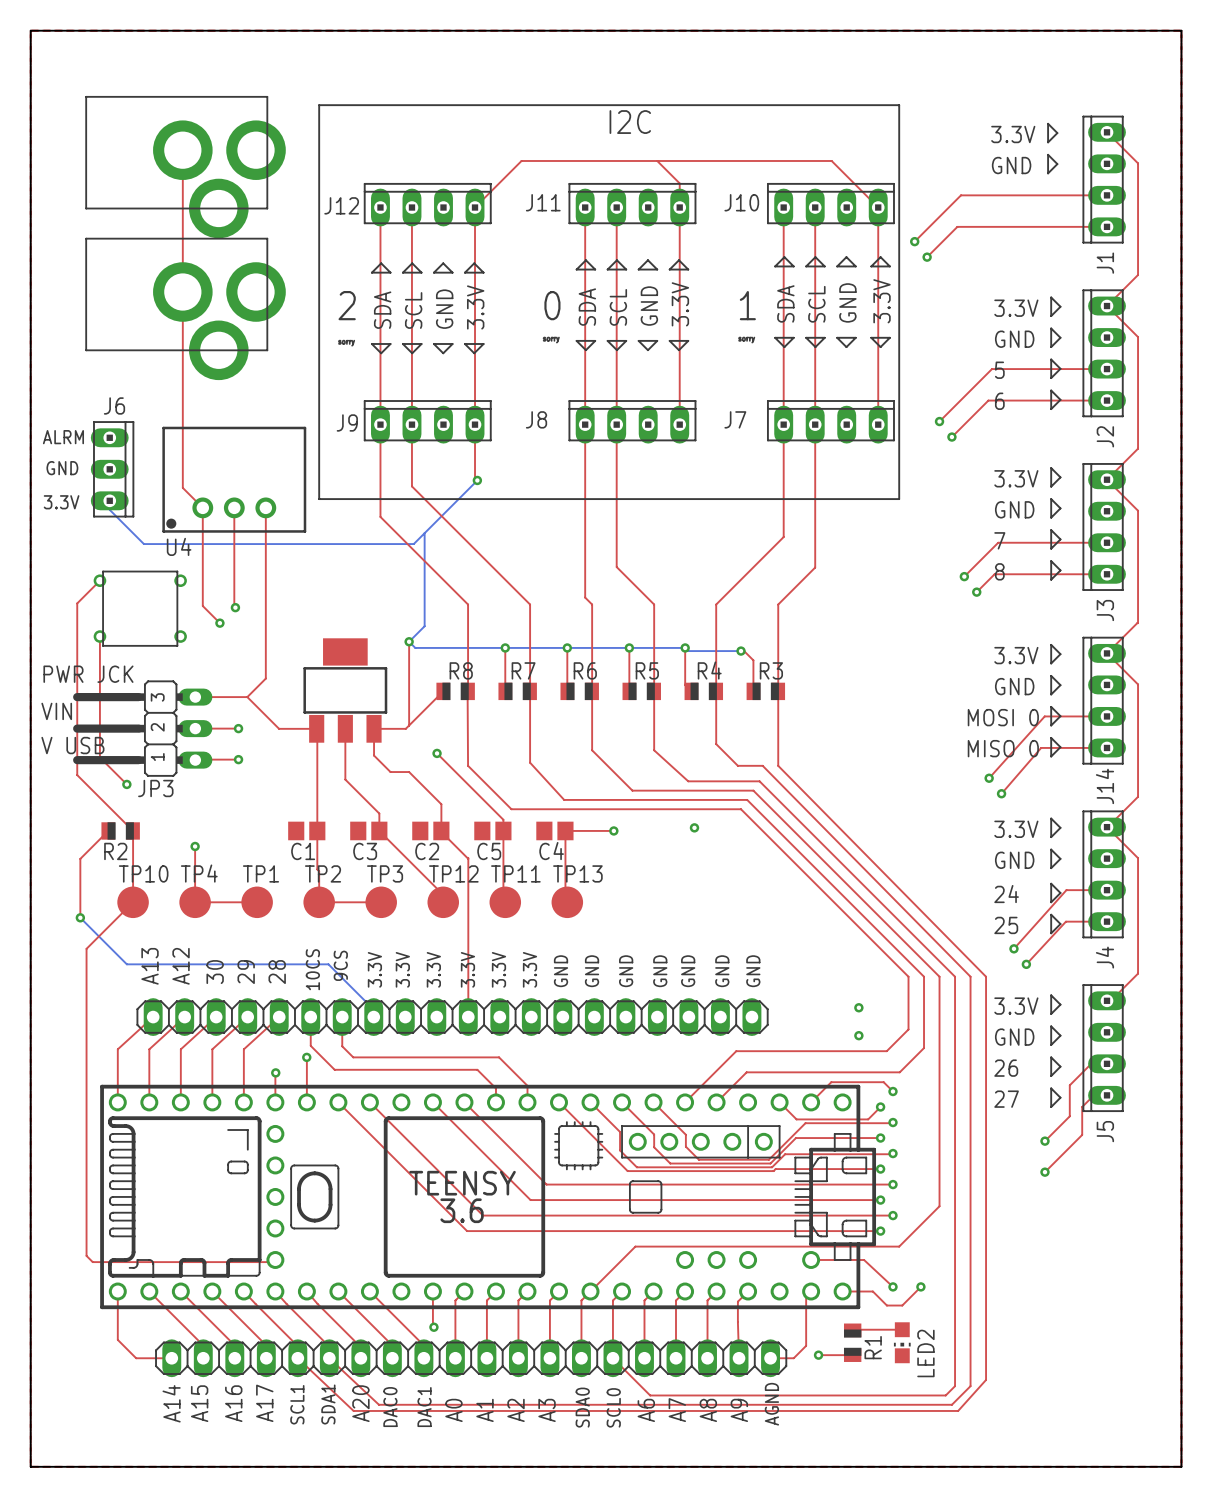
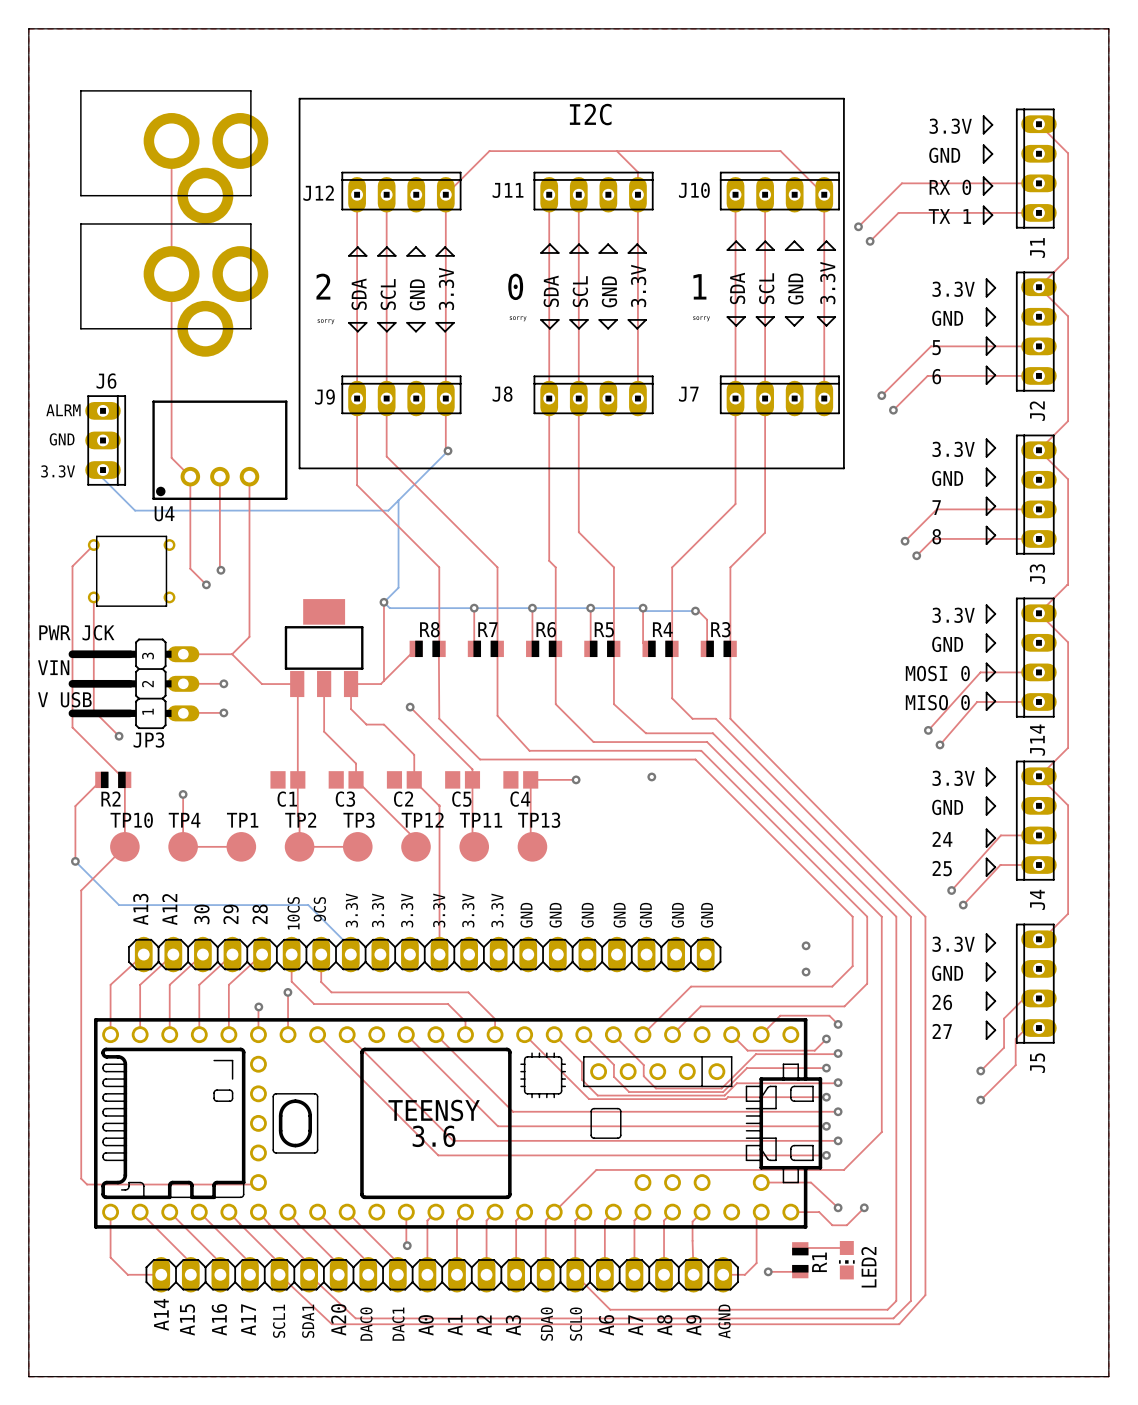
line: none -> (983, 177) (983, 194) (992, 186) (983, 177)
text: none -> RX 0 (950, 187)
line: none -> (983, 206) (992, 215) (983, 223) (983, 206)
text: none -> TX 1 (949, 216)

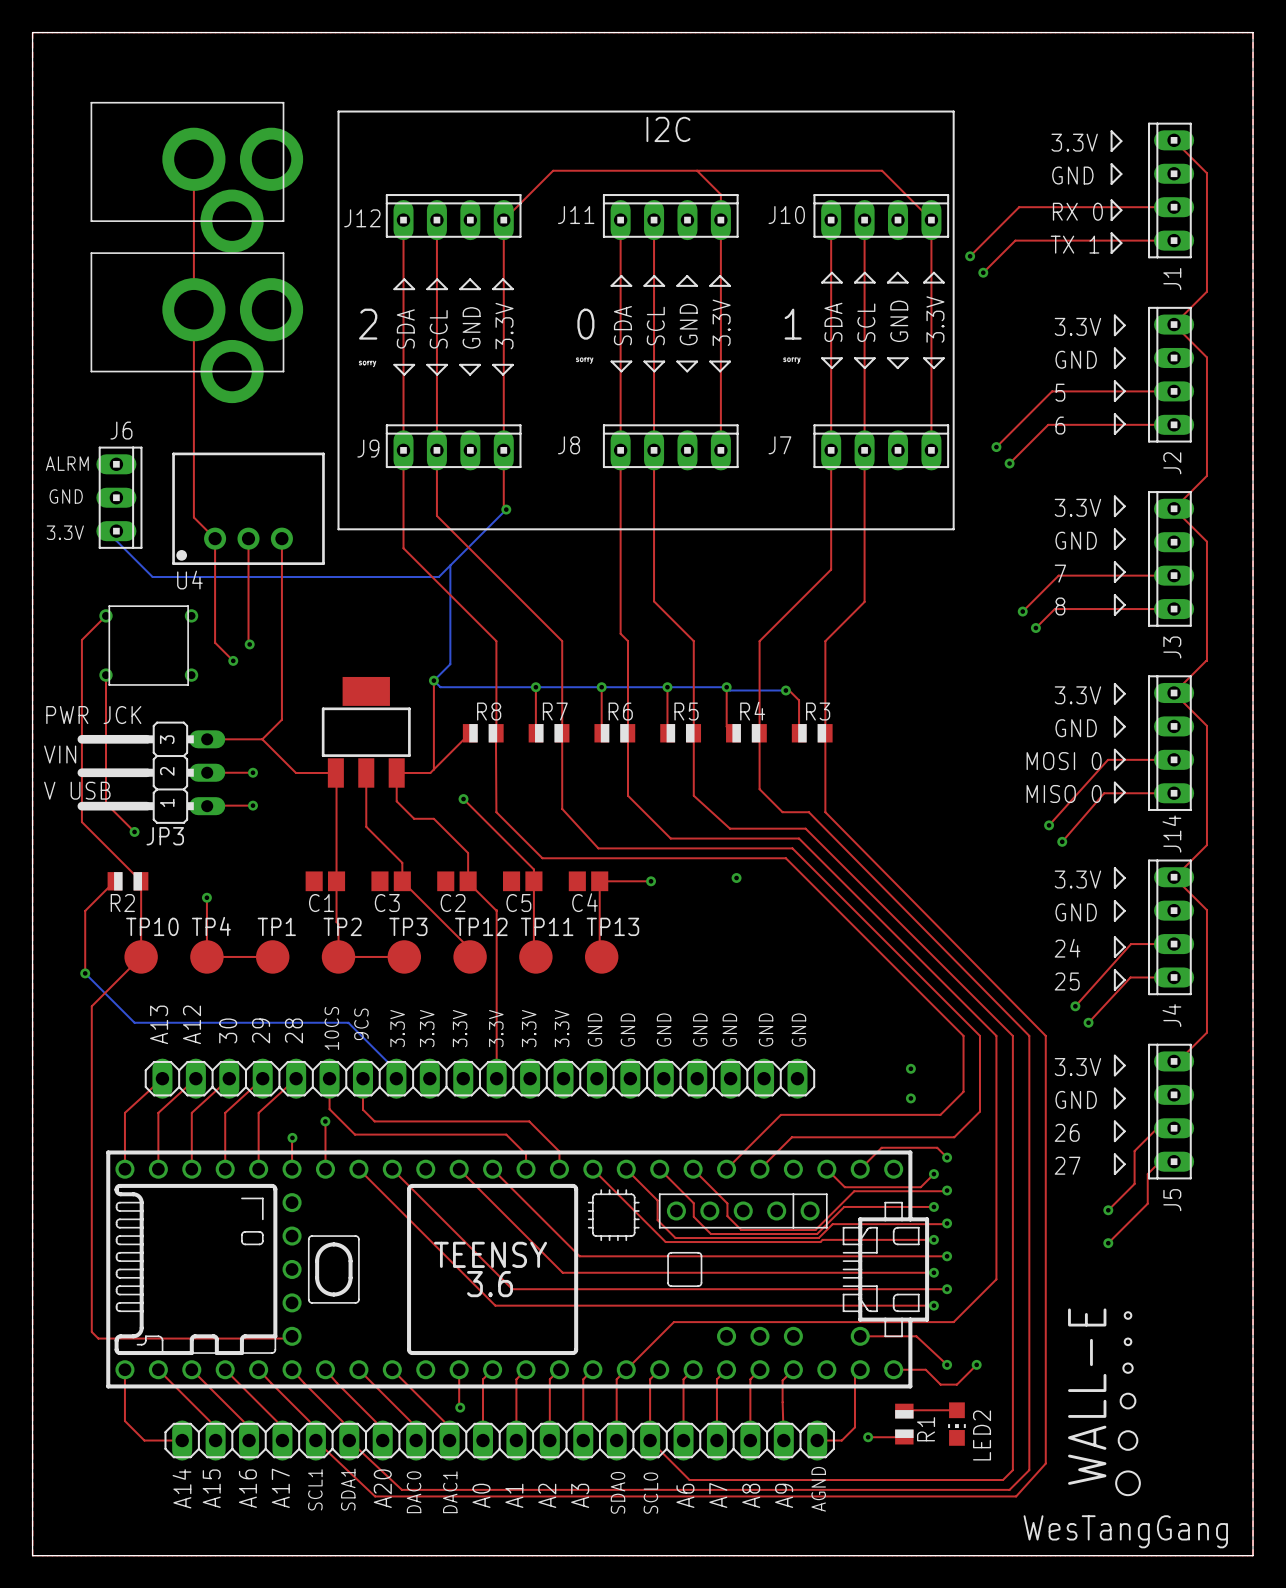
drawing: none -> [1123, 1311, 1133, 1320]
drawing: none -> [1123, 1337, 1133, 1347]
drawing: none -> [1122, 1362, 1134, 1374]
drawing: none -> [1119, 1392, 1137, 1410]
text: none -> WALL-E (1087, 1396)
drawing: none -> [1117, 1430, 1139, 1451]
drawing: none -> [1115, 1470, 1141, 1497]
text: none -> WesTangGang (1125, 1531)

